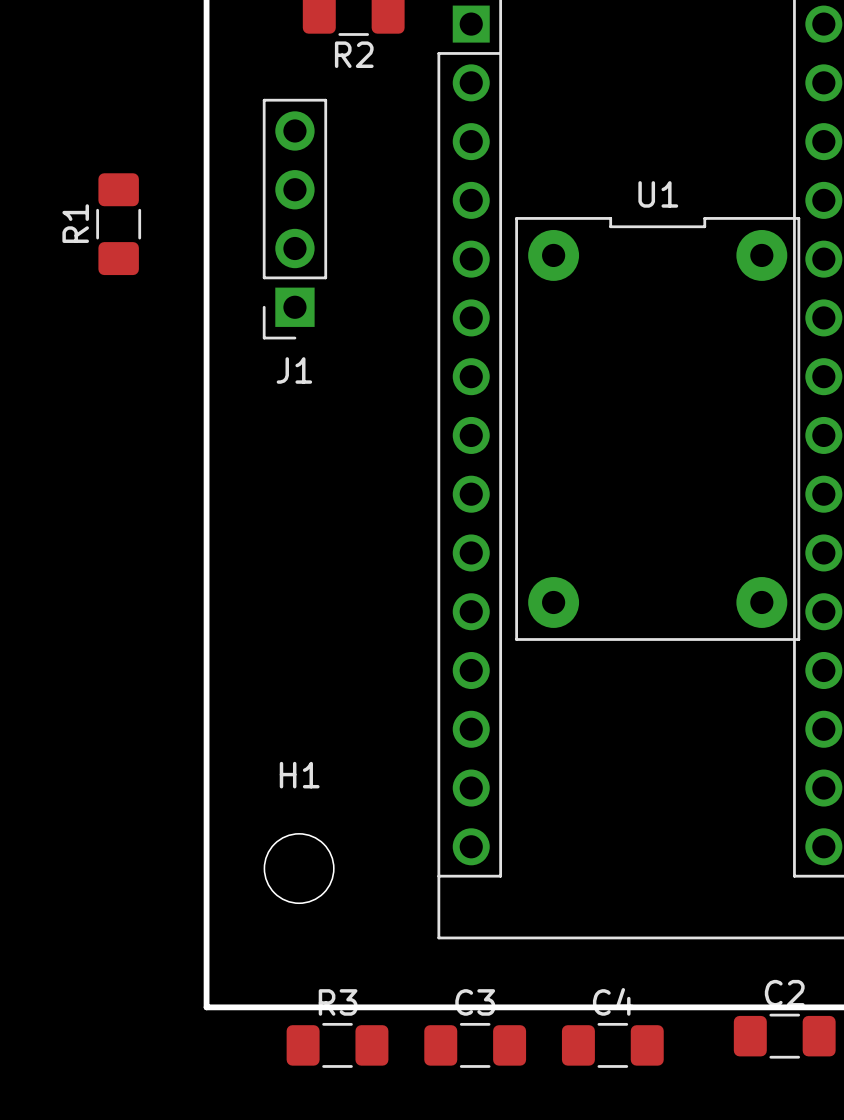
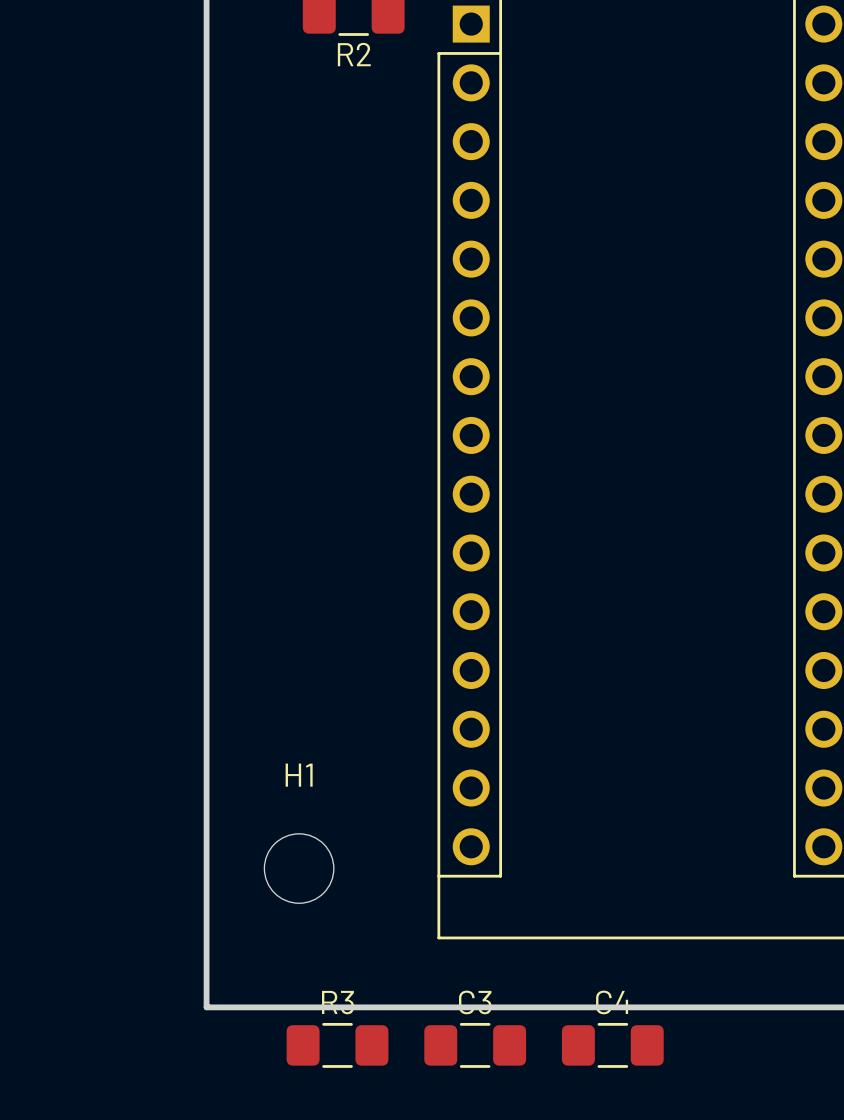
J1: (294, 219) -> none
R1: (118, 224) -> none
U1: (657, 428) -> none
C2: (784, 1036) -> none

